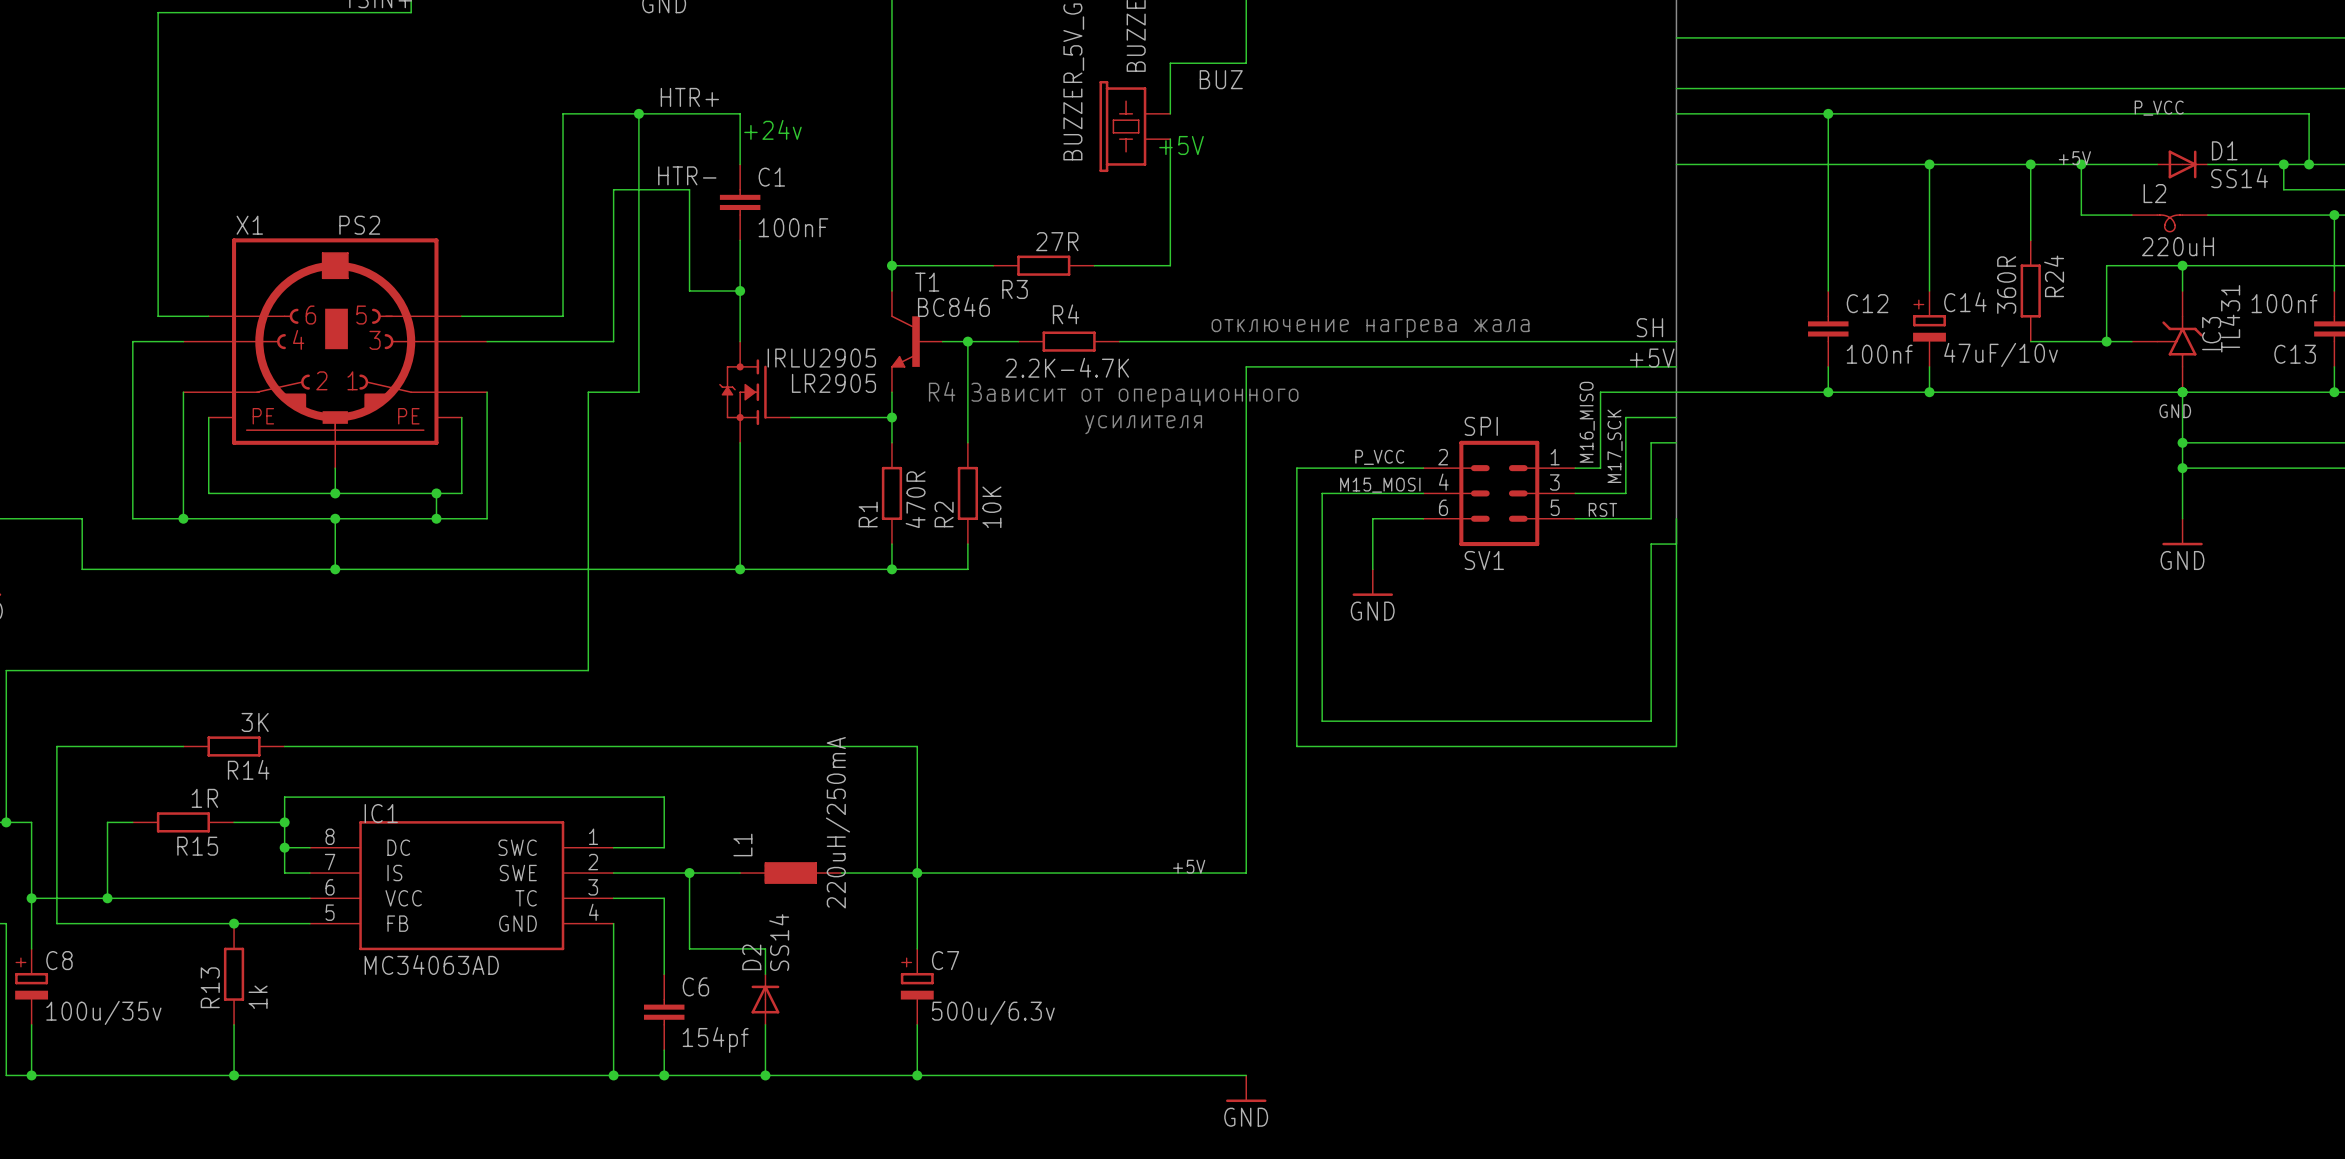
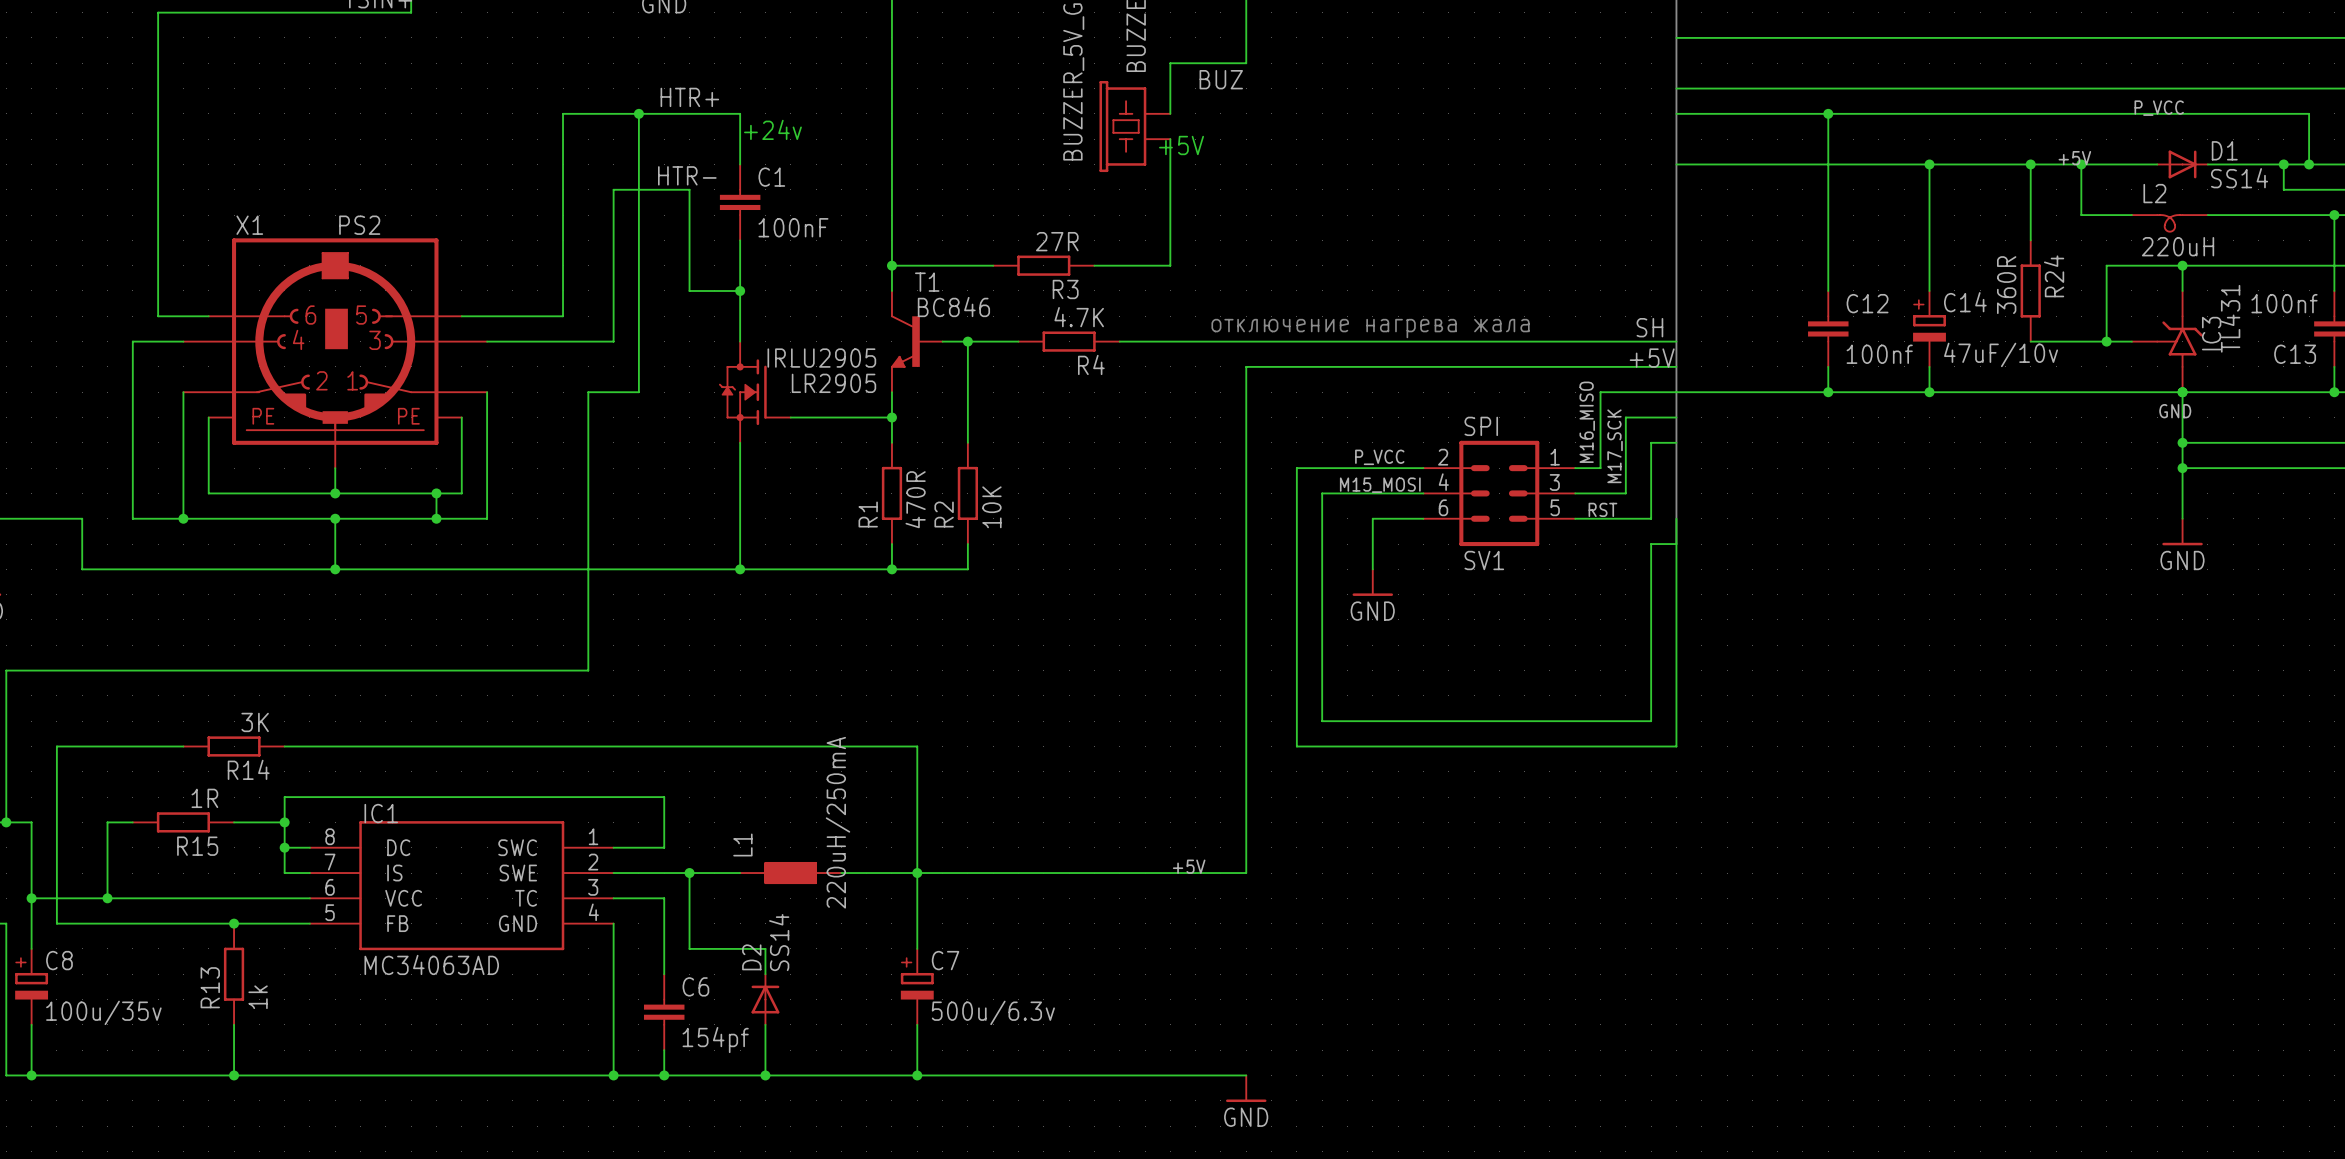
R3 name position: R3 (1015, 289) -> R3 (1065, 289)
R4 name position: R4 (1066, 314) -> R4 (1091, 364)
R4 value: 2.2K-4.7K (1067, 367) -> 4.7K (1079, 317)
text: R4 Зависит от операционного (1113, 394) -> none
text: усилителя (1143, 424) -> none

